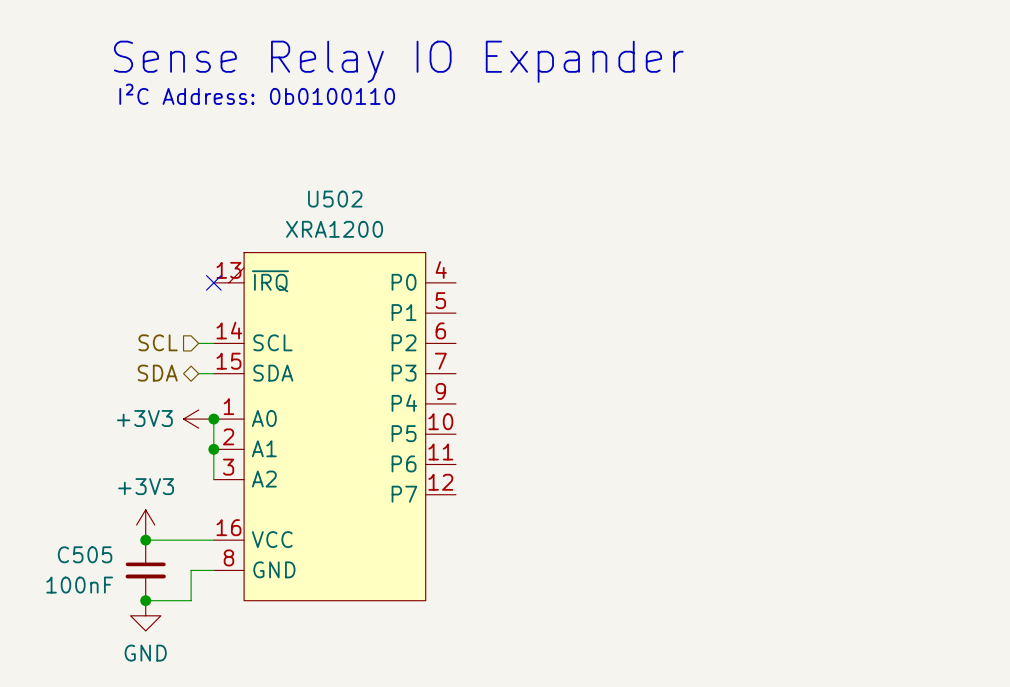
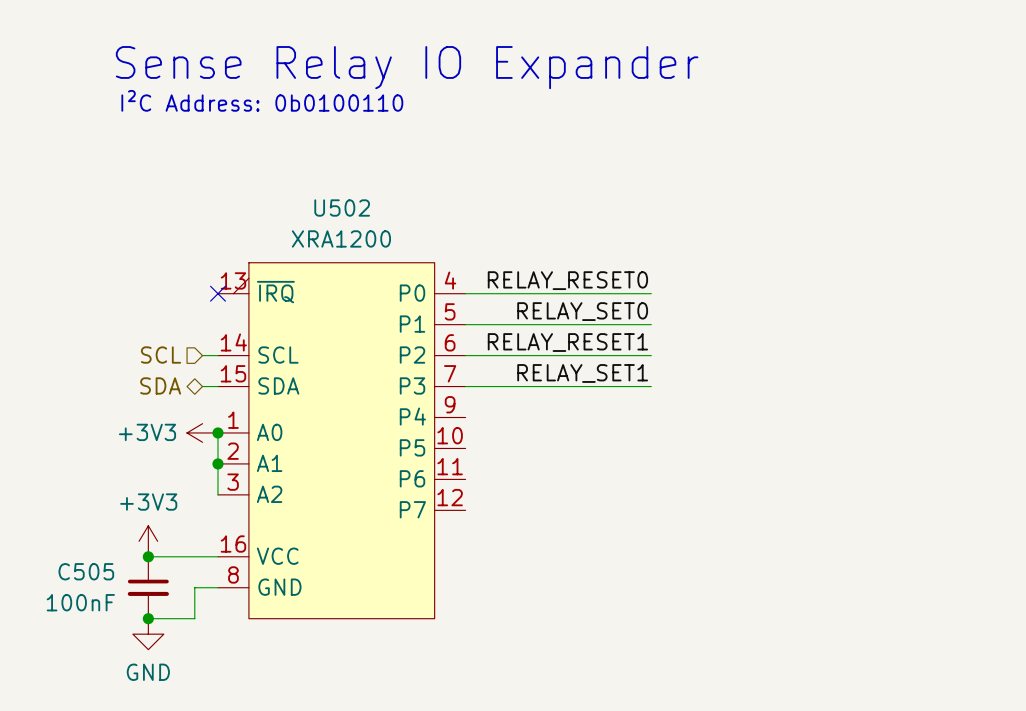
label: none -> RELAY_RESET0 (567, 280)
wire: none -> (465, 293) (651, 293)
label: none -> RELAY_SET0 (582, 311)
wire: none -> (465, 324) (651, 324)
label: none -> RELAY_RESET1 (567, 342)
wire: none -> (465, 355) (651, 355)
label: none -> RELAY_SET1 (582, 373)
wire: none -> (465, 386) (651, 386)

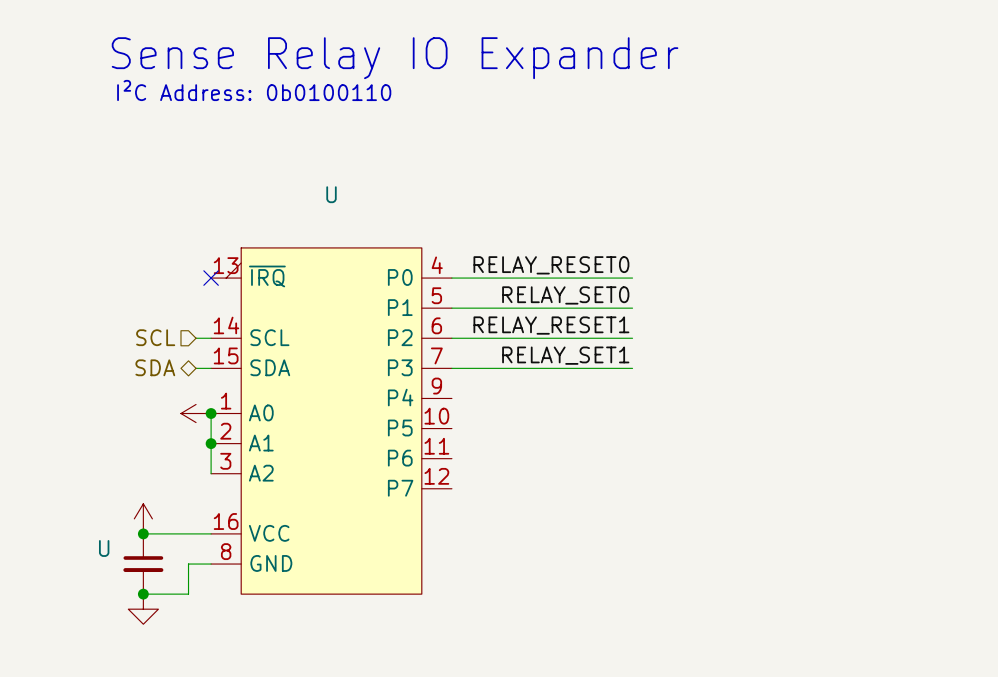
U502 name: U502 (342, 208) -> U (331, 194)
U502 value: XRA1200 (341, 238) -> none
power symbol text: +3V3 (147, 432) -> none
power symbol text: +3V3 (148, 502) -> none
C505 name: C505 (86, 571) -> U (104, 548)
C505 value: 100nF (80, 602) -> none
power symbol text: GND (148, 672) -> none

